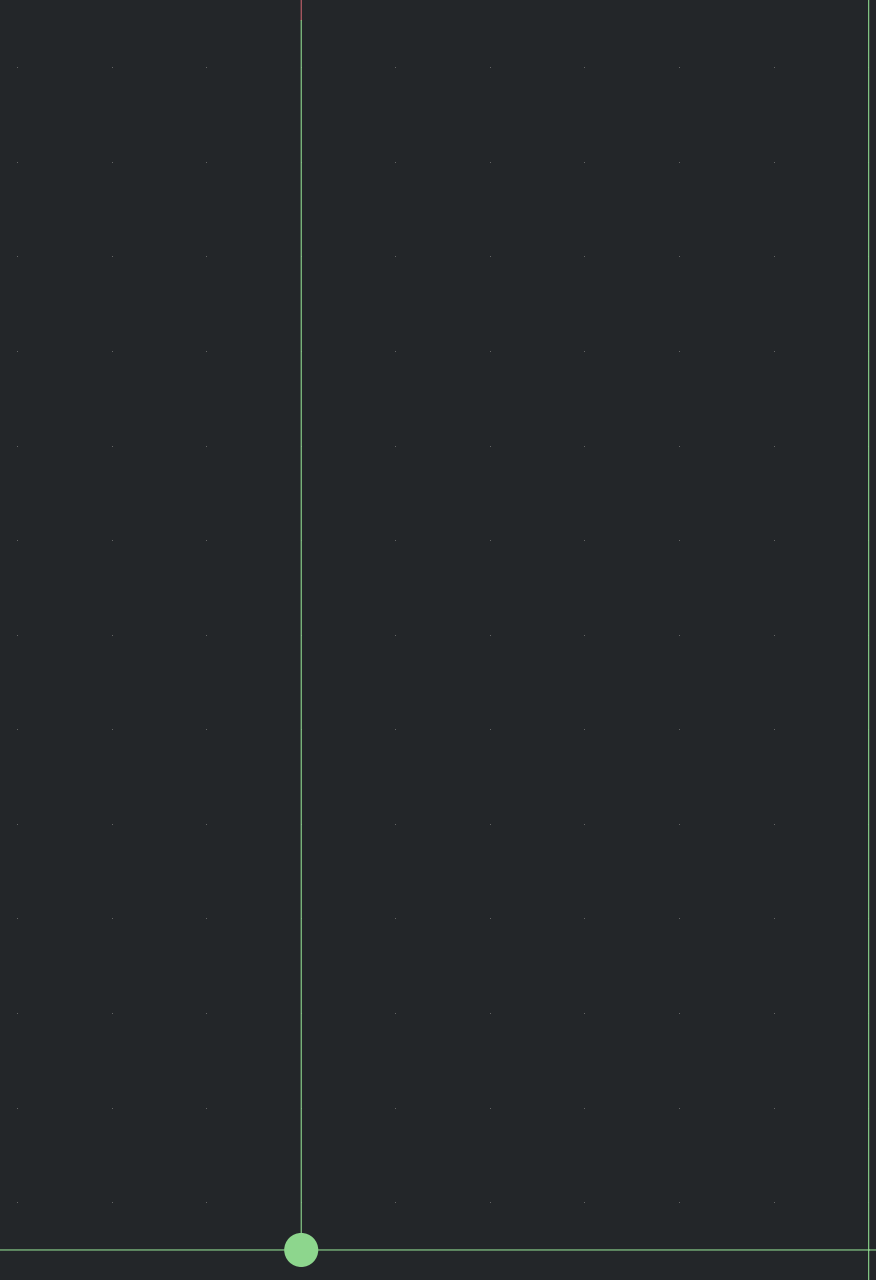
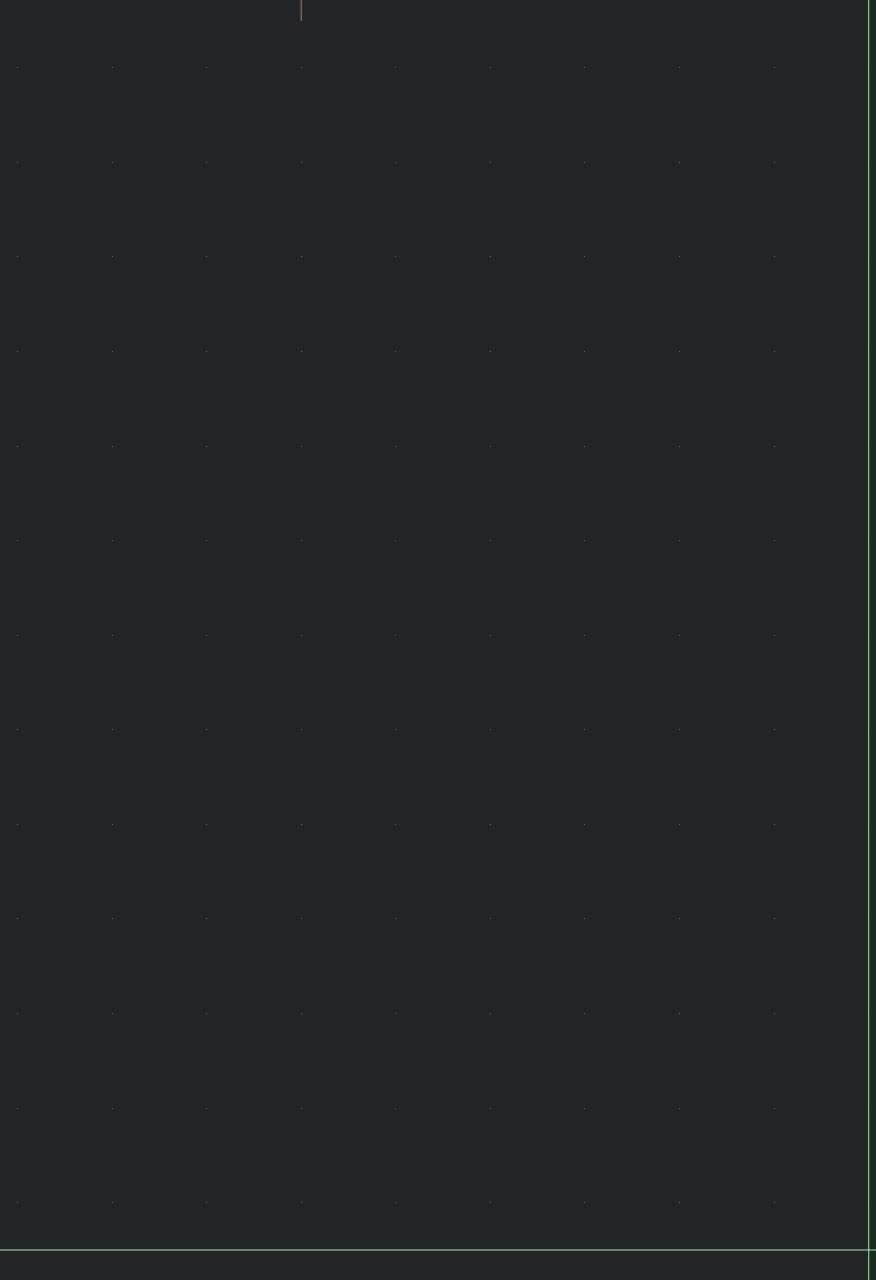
wire: (301, 20) (301, 1249) -> none
junction: (301, 1249) -> none

